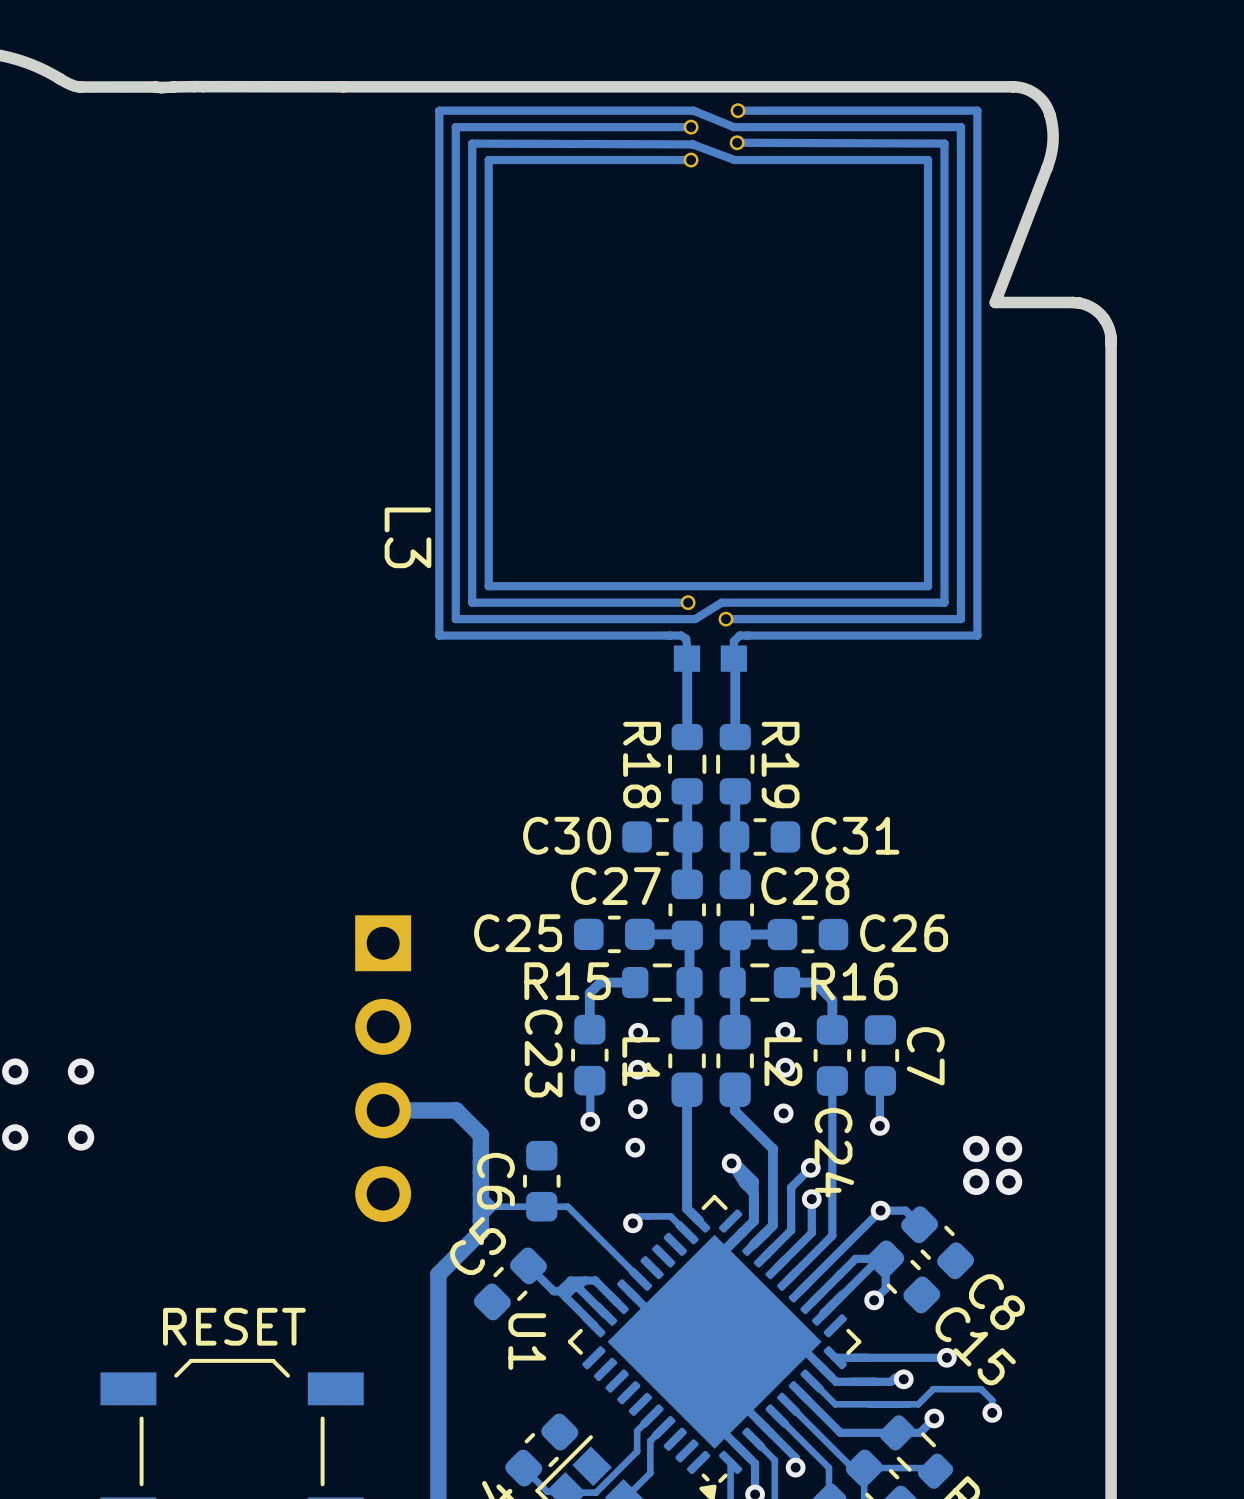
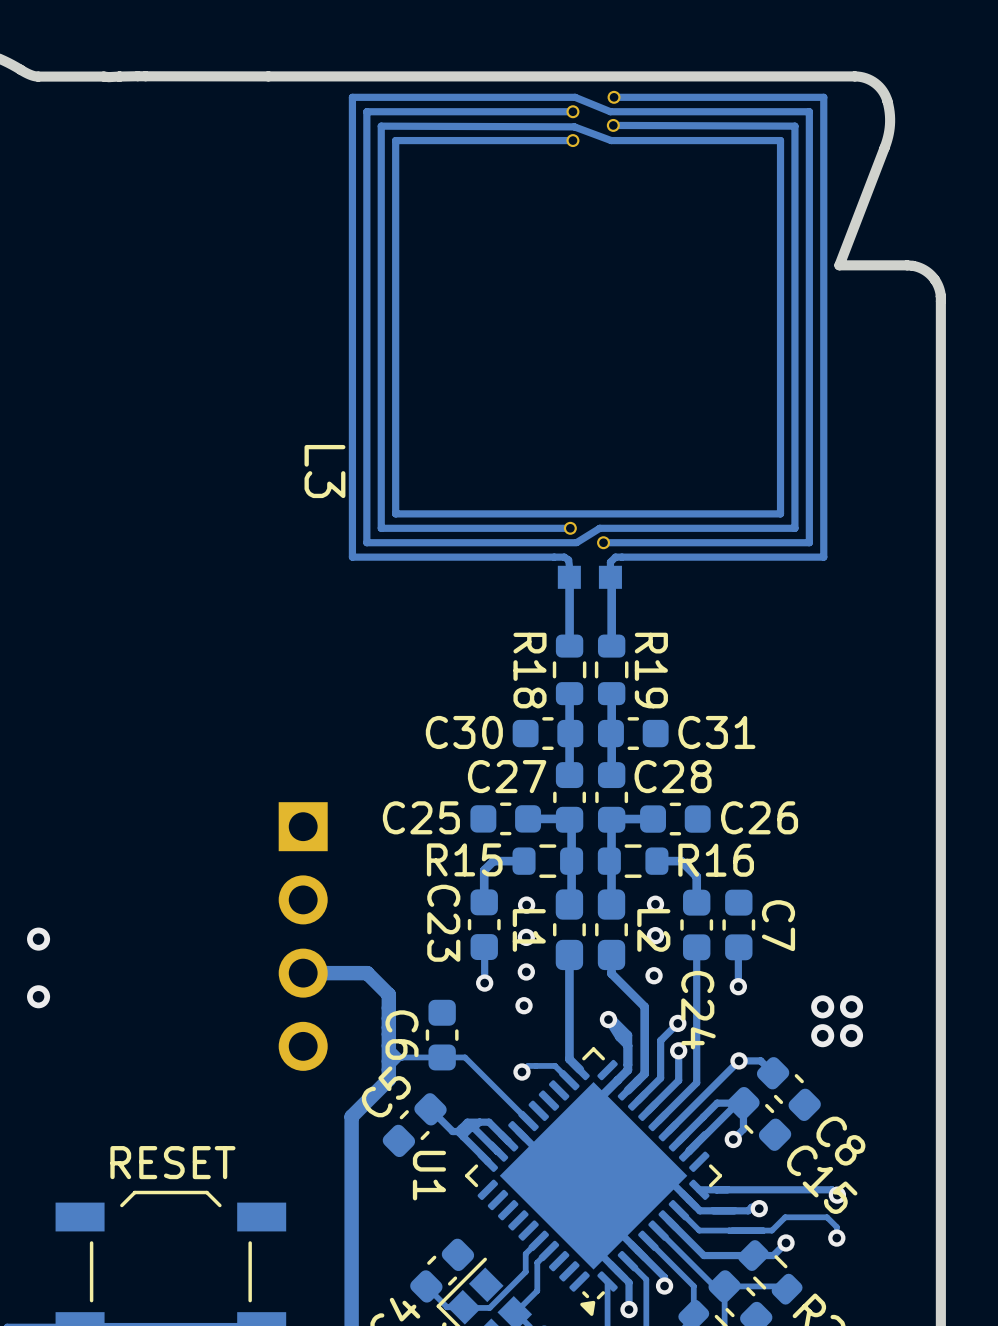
track: none -> (797, 1189) (832, 1189) (837, 1195)
via position: (946, 1357) -> (837, 1195)

